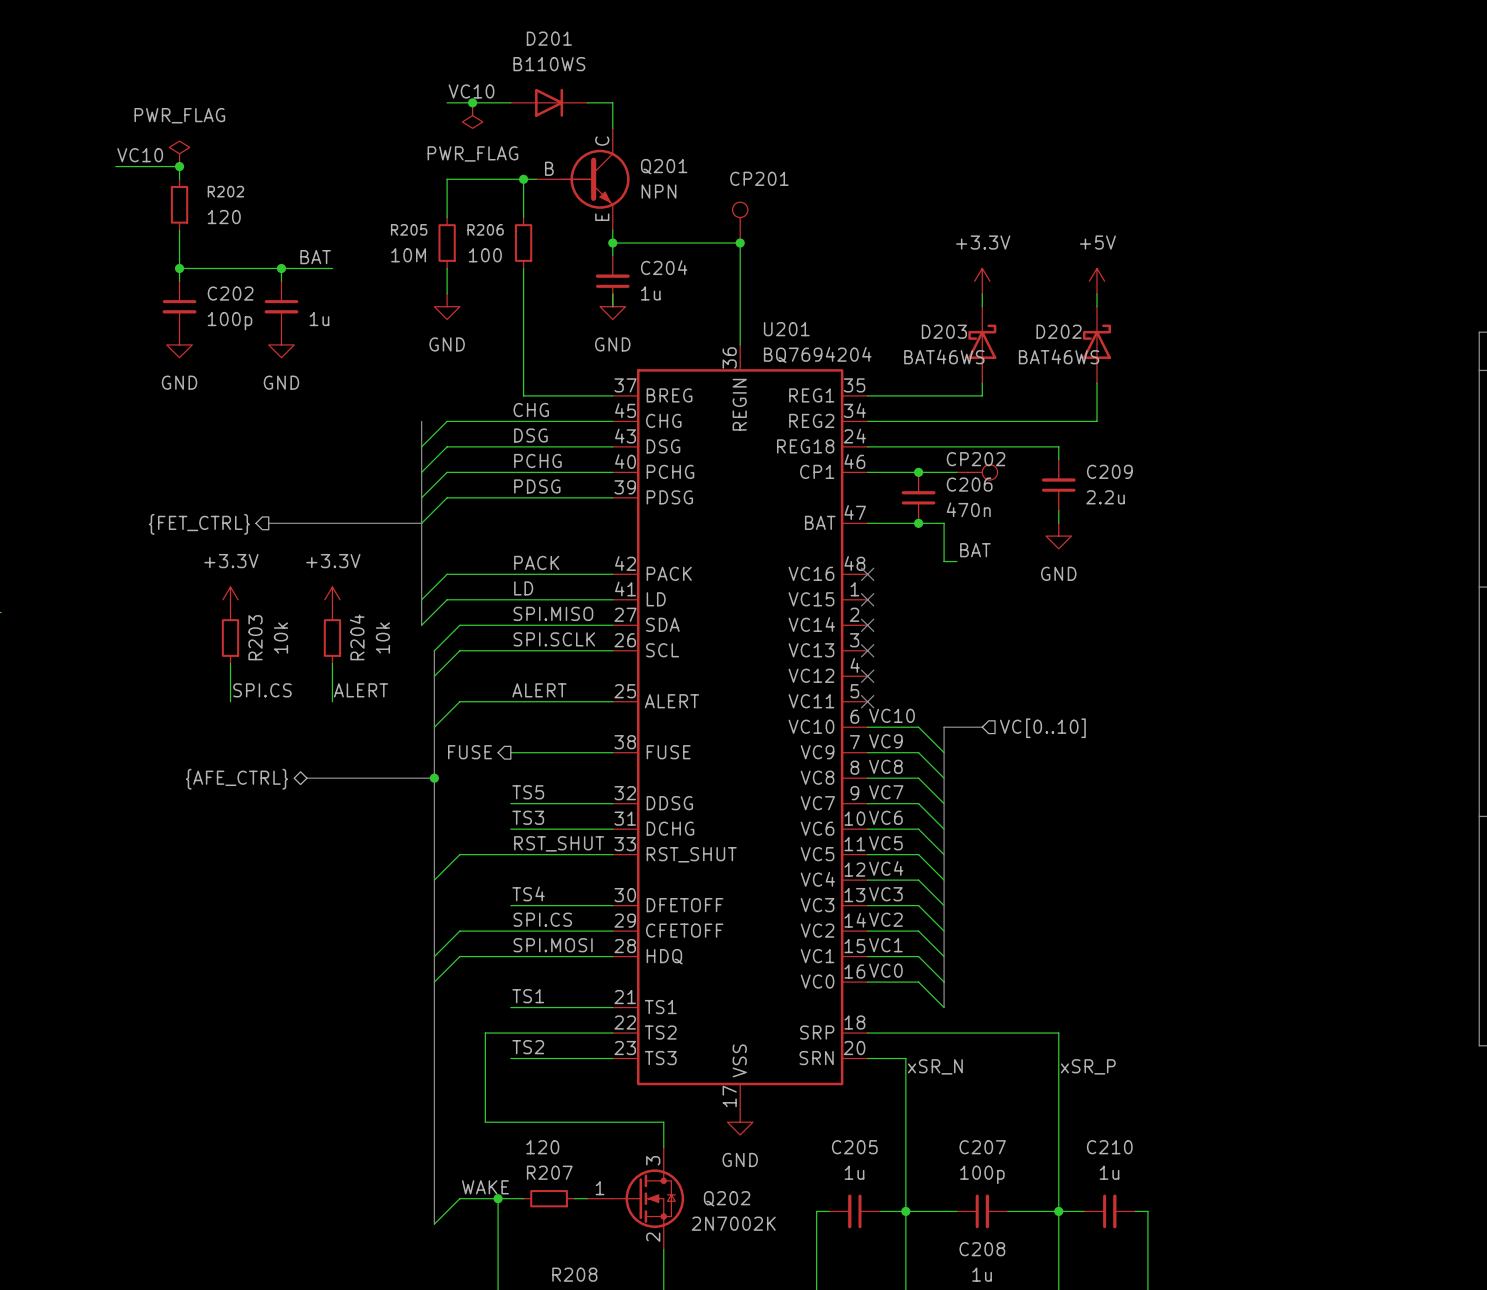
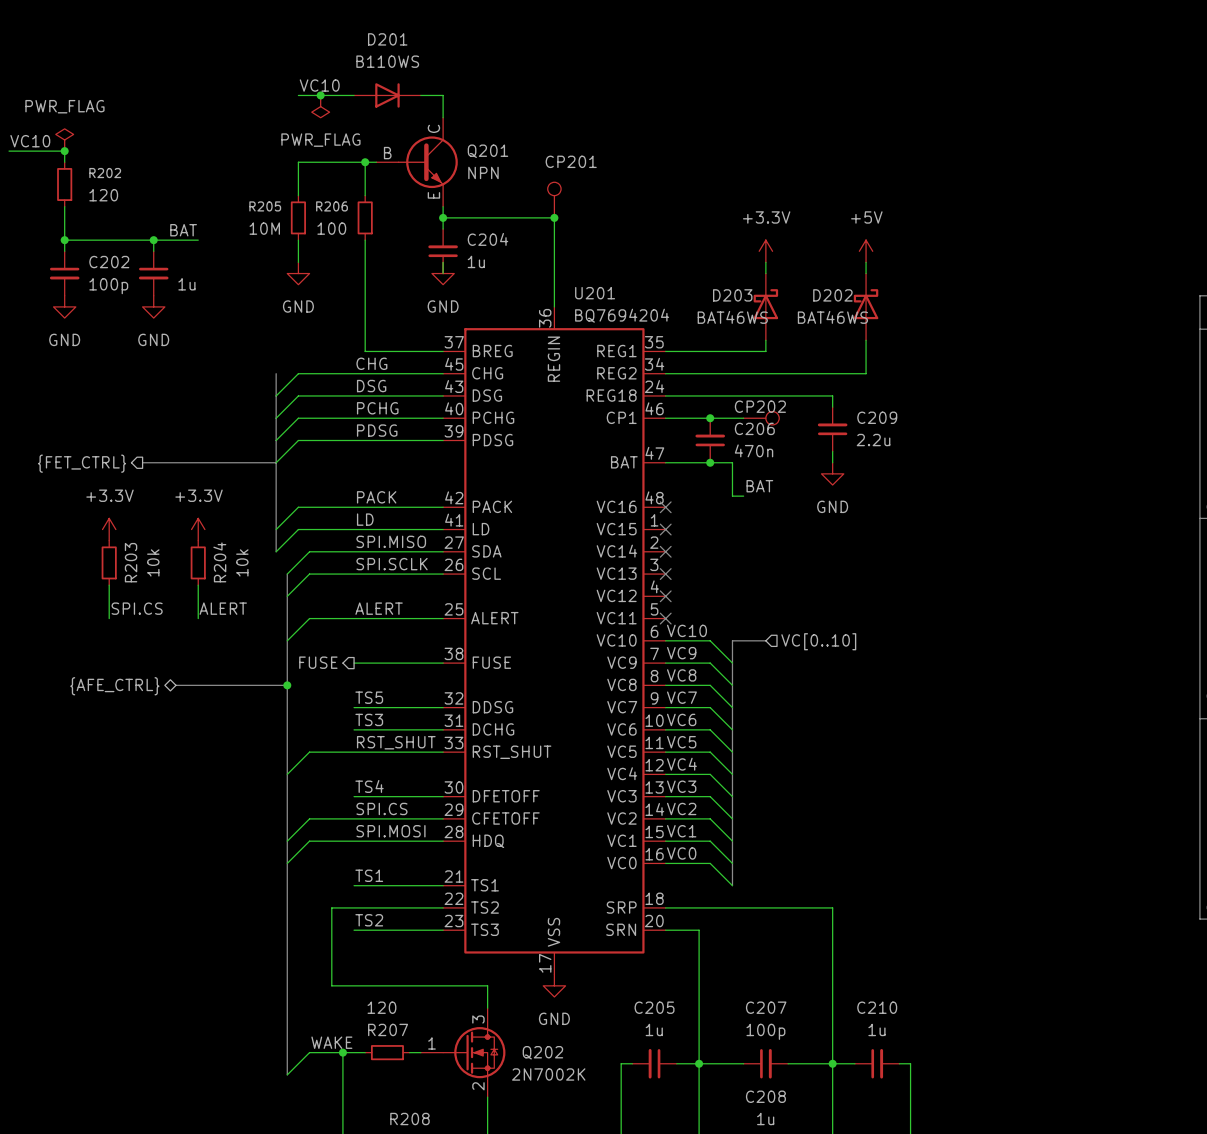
label: xSR_N (935, 1066) -> none
label: xSR_P (1088, 1066) -> none

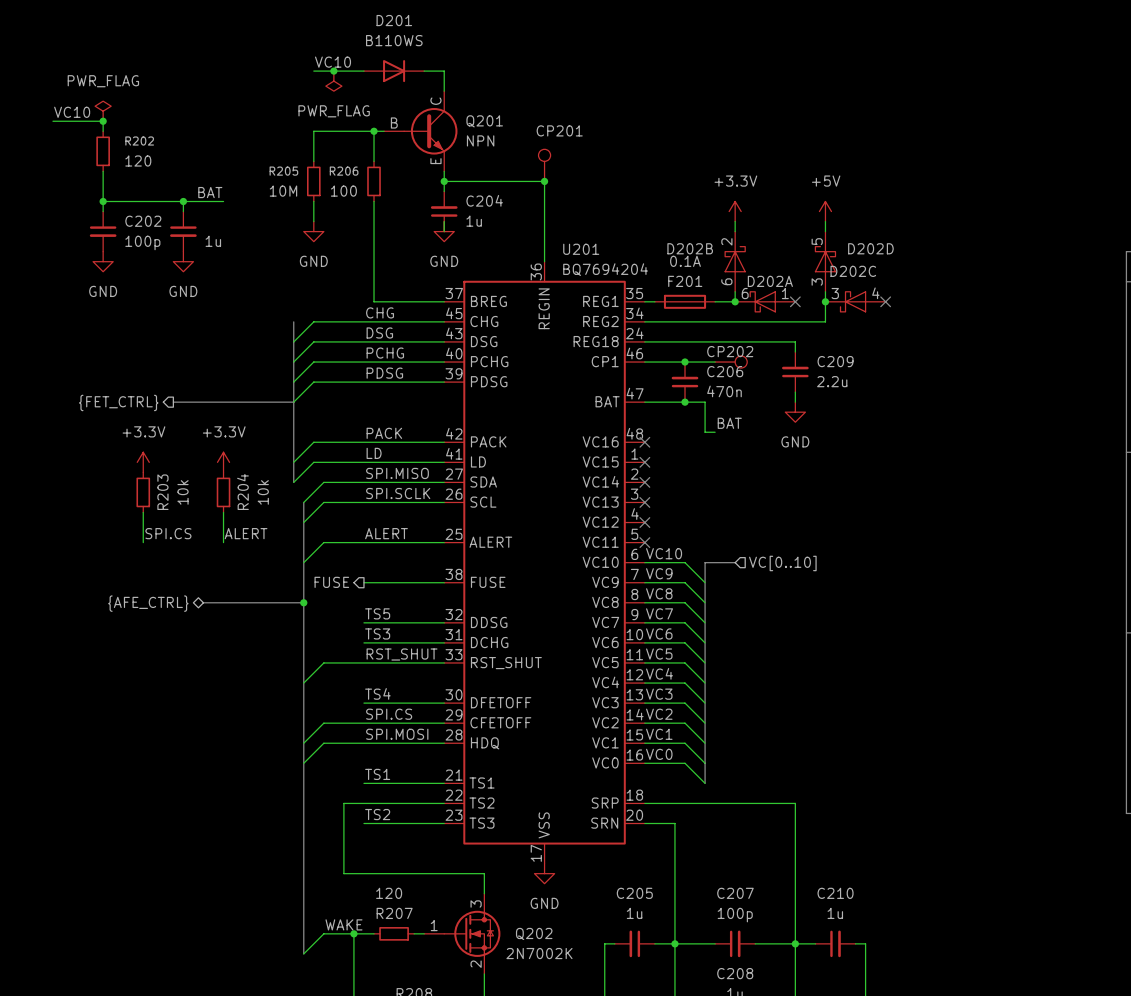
D203: BAT46WS (765, 306) -> none
D202B: none -> (735, 261)
D202: BAT46WS (866, 306) -> none
D202D: none -> (825, 261)
F201: none -> 0.1A (685, 301)
junction: none -> (735, 301)
D202A: none -> (765, 301)
no-connect mark: none -> (795, 301)
junction: none -> (825, 301)
D202C: none -> (855, 301)
no-connect mark: none -> (885, 301)

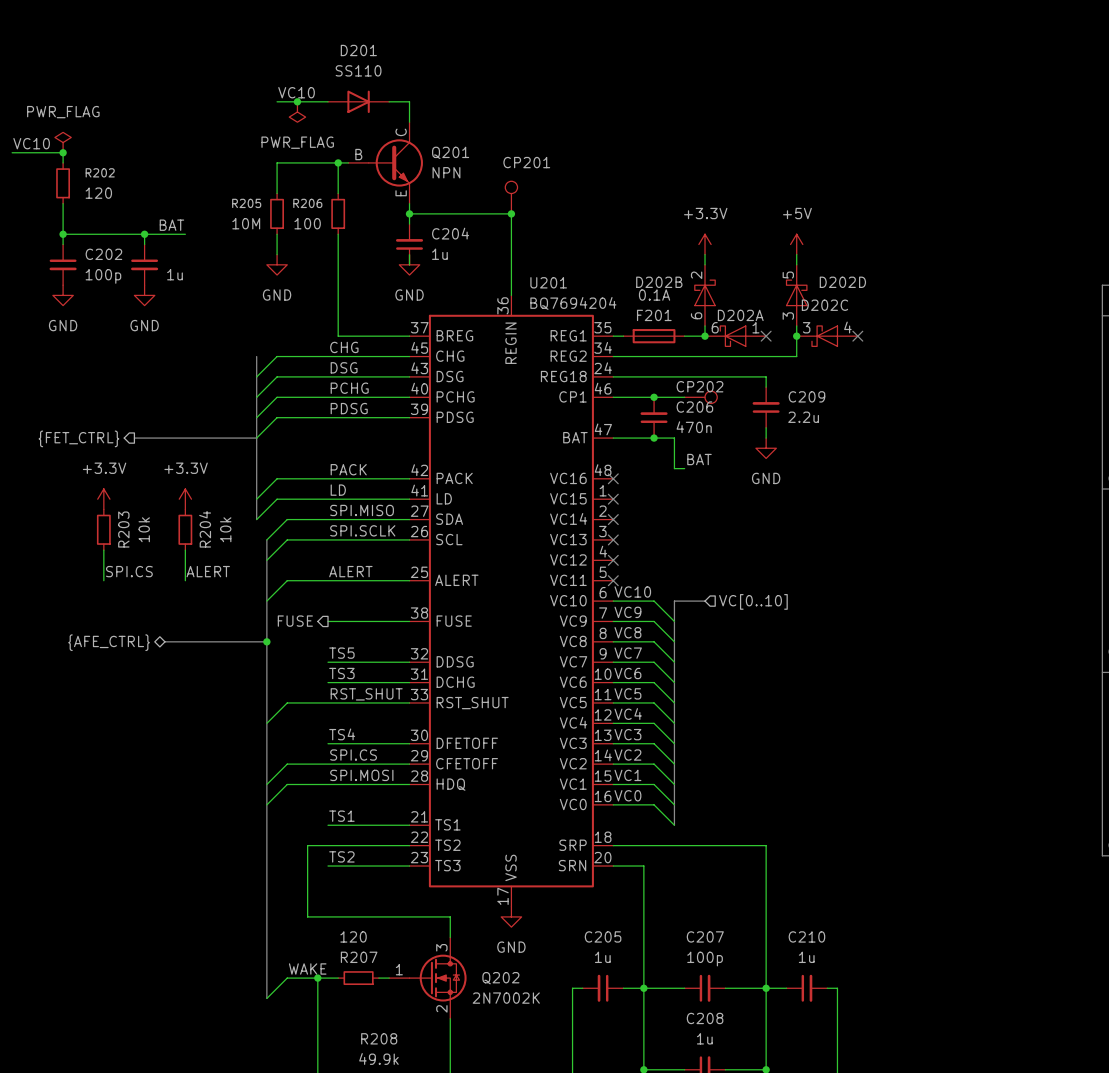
D201 value: B110WS (394, 40) -> SS110 (358, 70)

